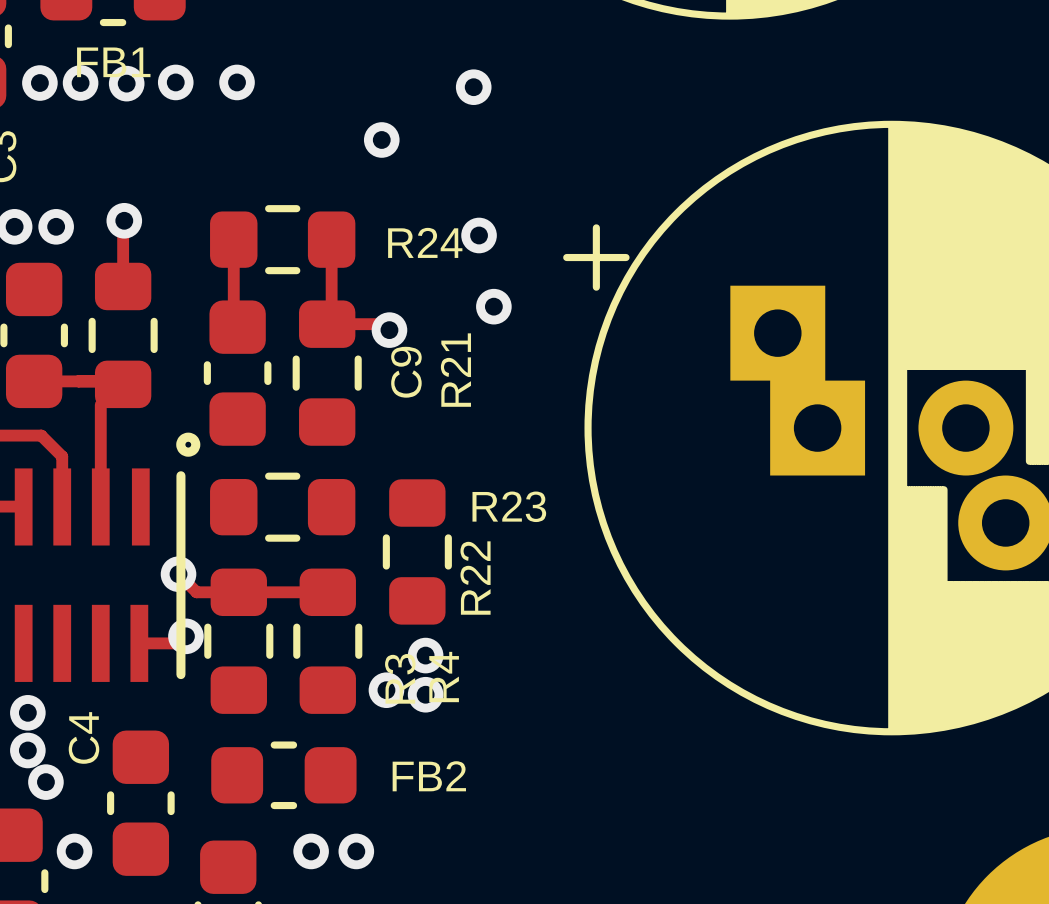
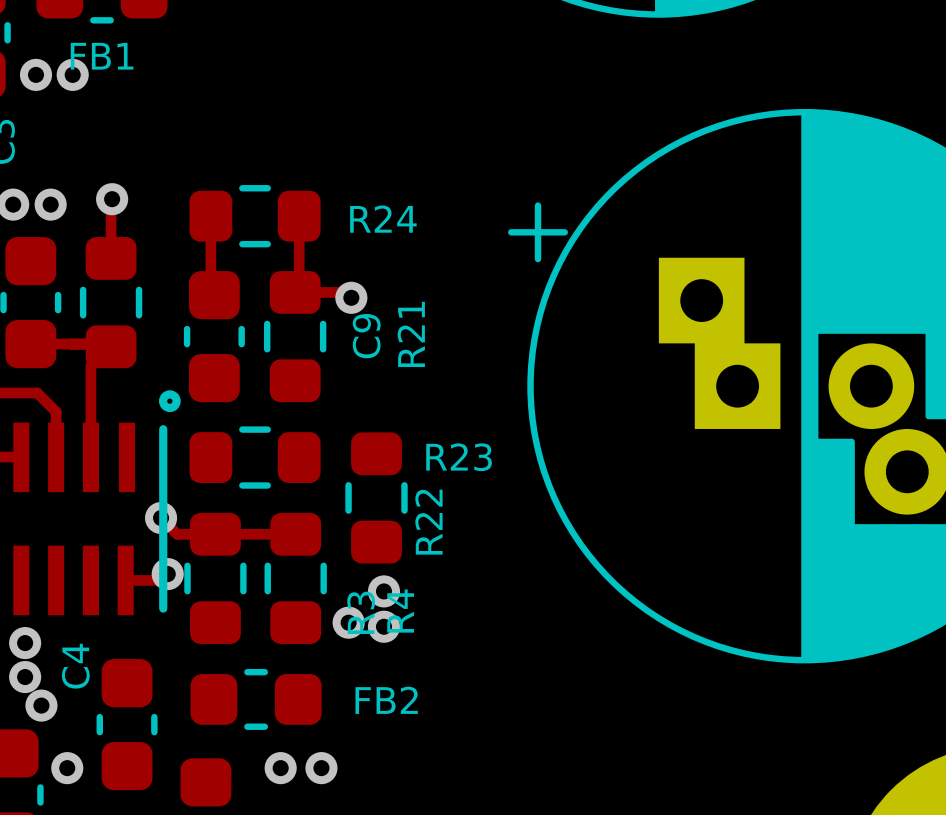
via: (175, 82) -> none
via: (237, 82) -> none
via: (126, 83) -> none
via: (473, 87) -> none
via: (381, 139) -> none
via: (479, 235) -> none
via: (493, 306) -> none

